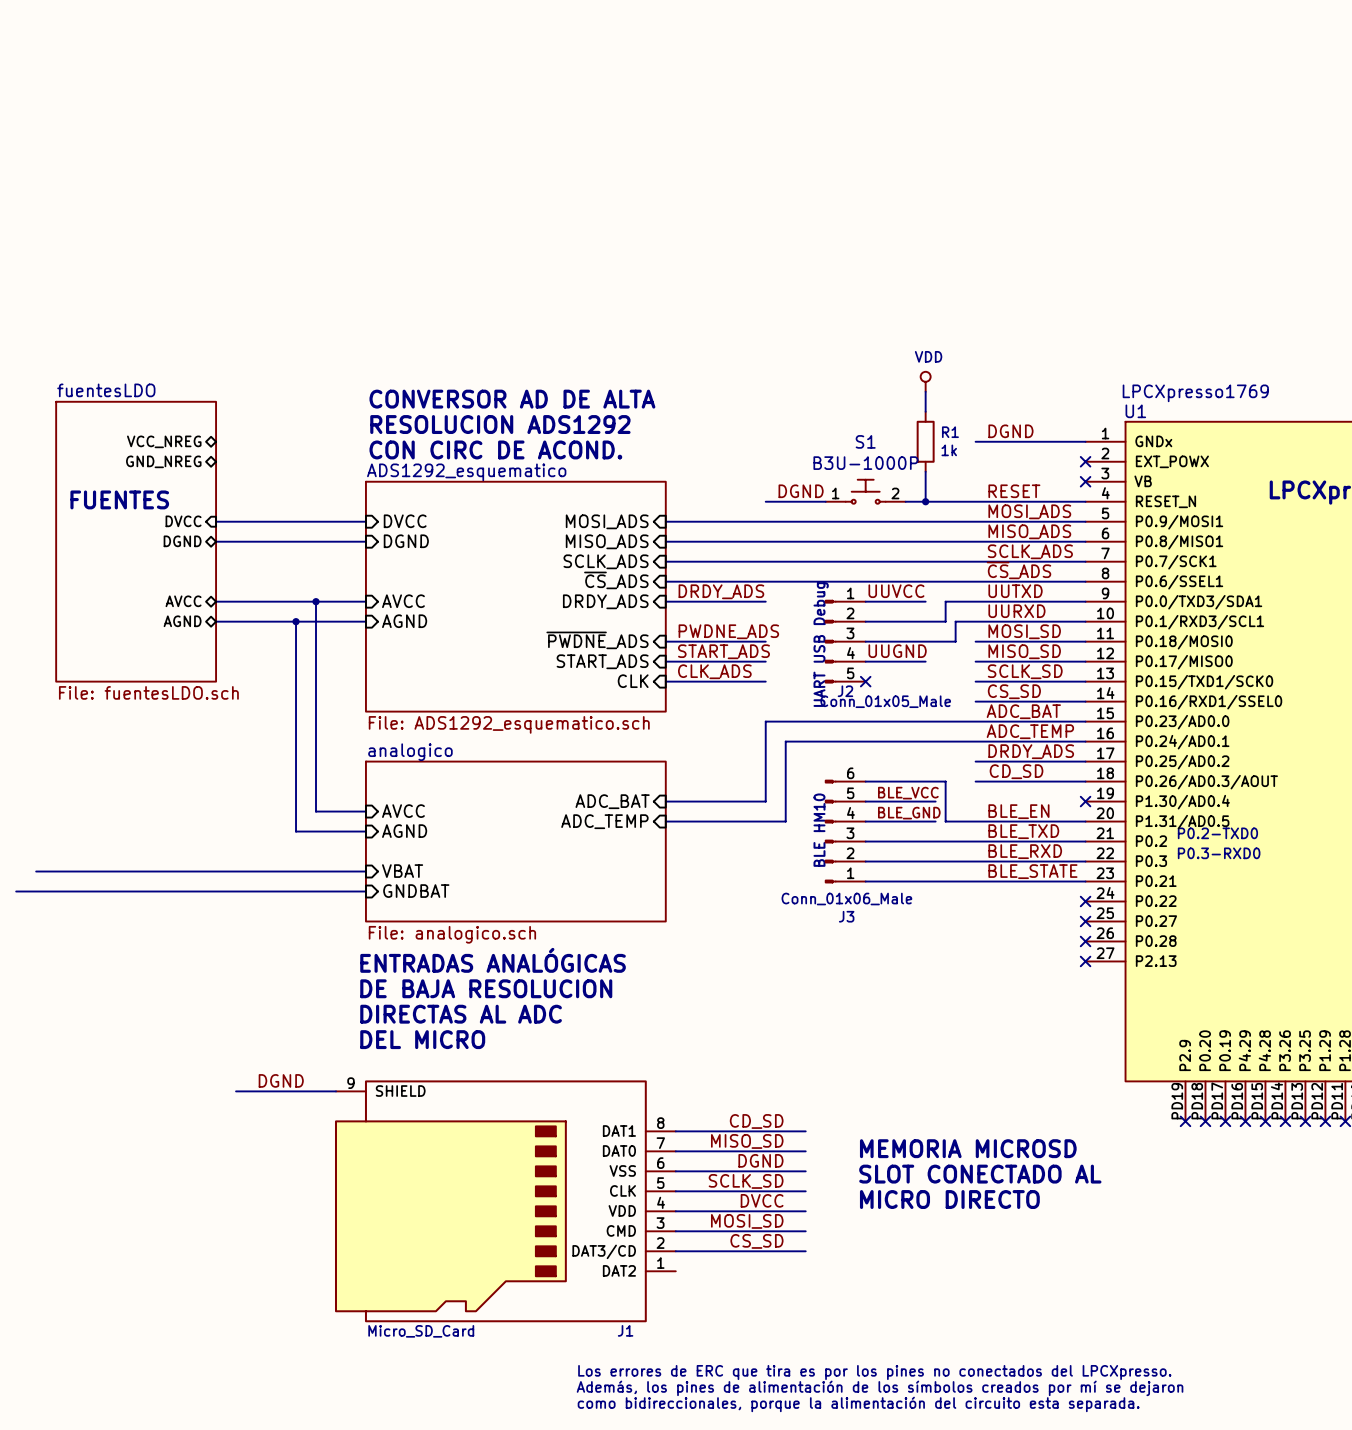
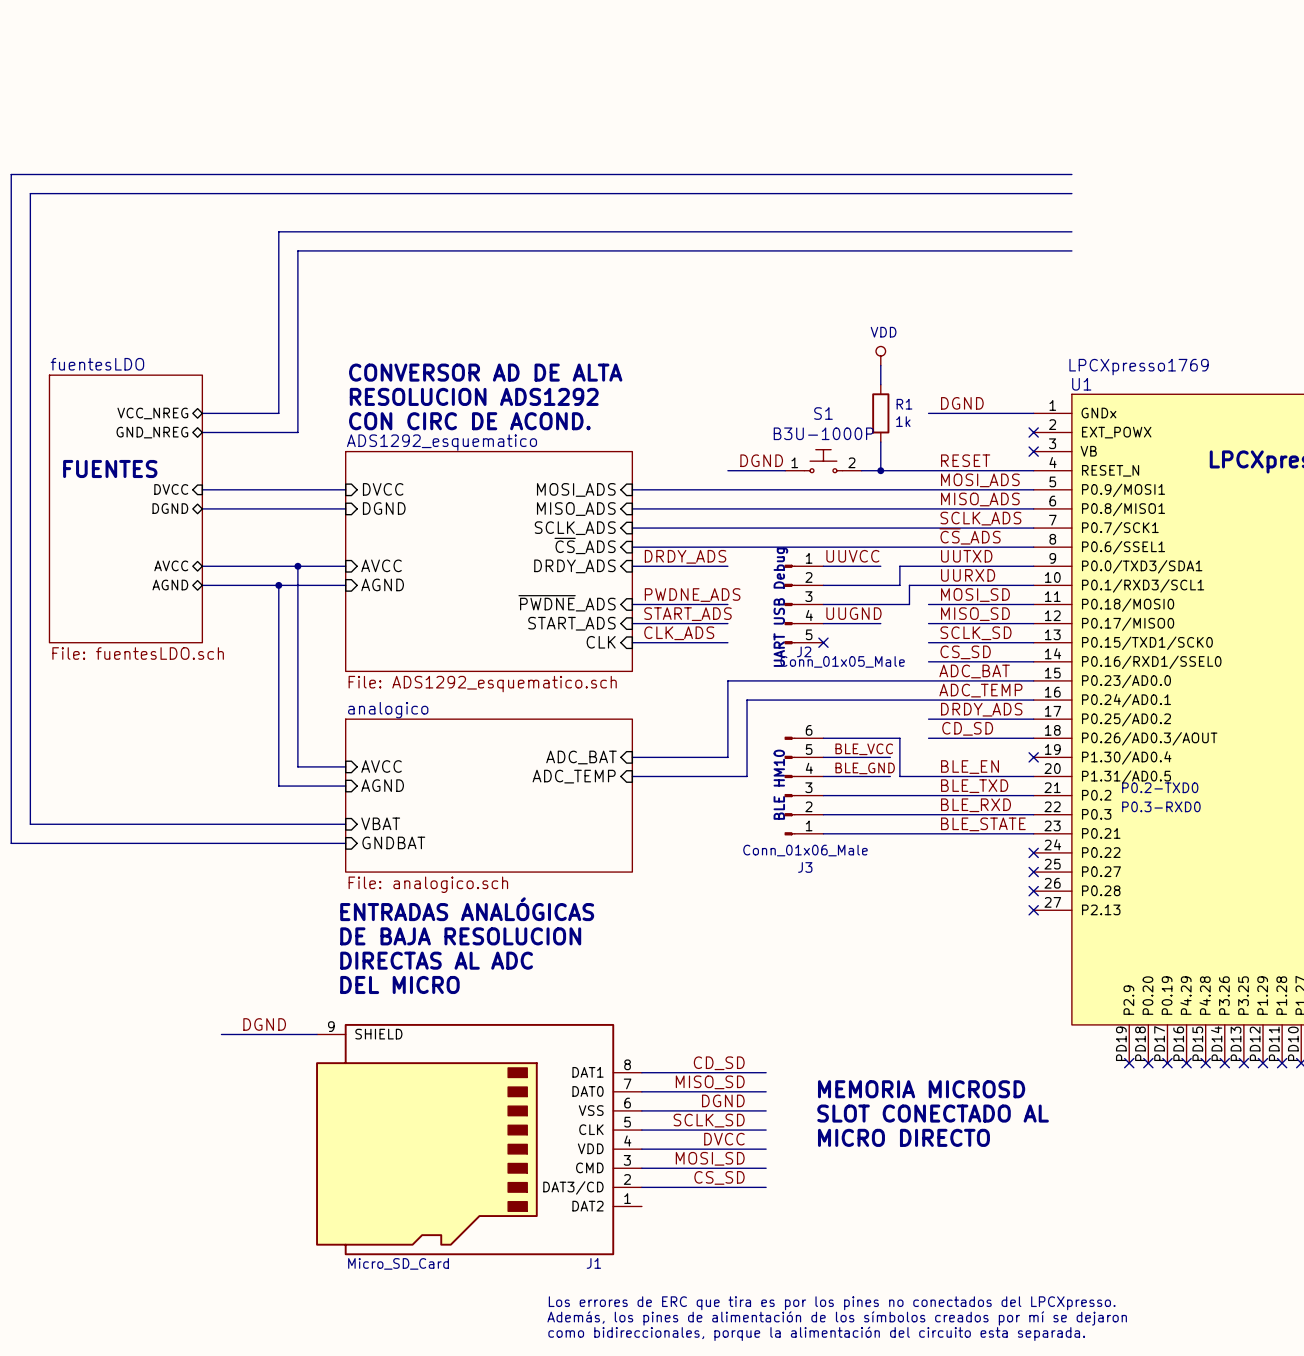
wire: none -> (1071, 174) (11, 174) (11, 843)
wire: none -> (1071, 193) (30, 193) (30, 824)
wire: none -> (1071, 231) (278, 231) (278, 413) (202, 413)
wire: none -> (1071, 250) (297, 250) (297, 432) (202, 432)

